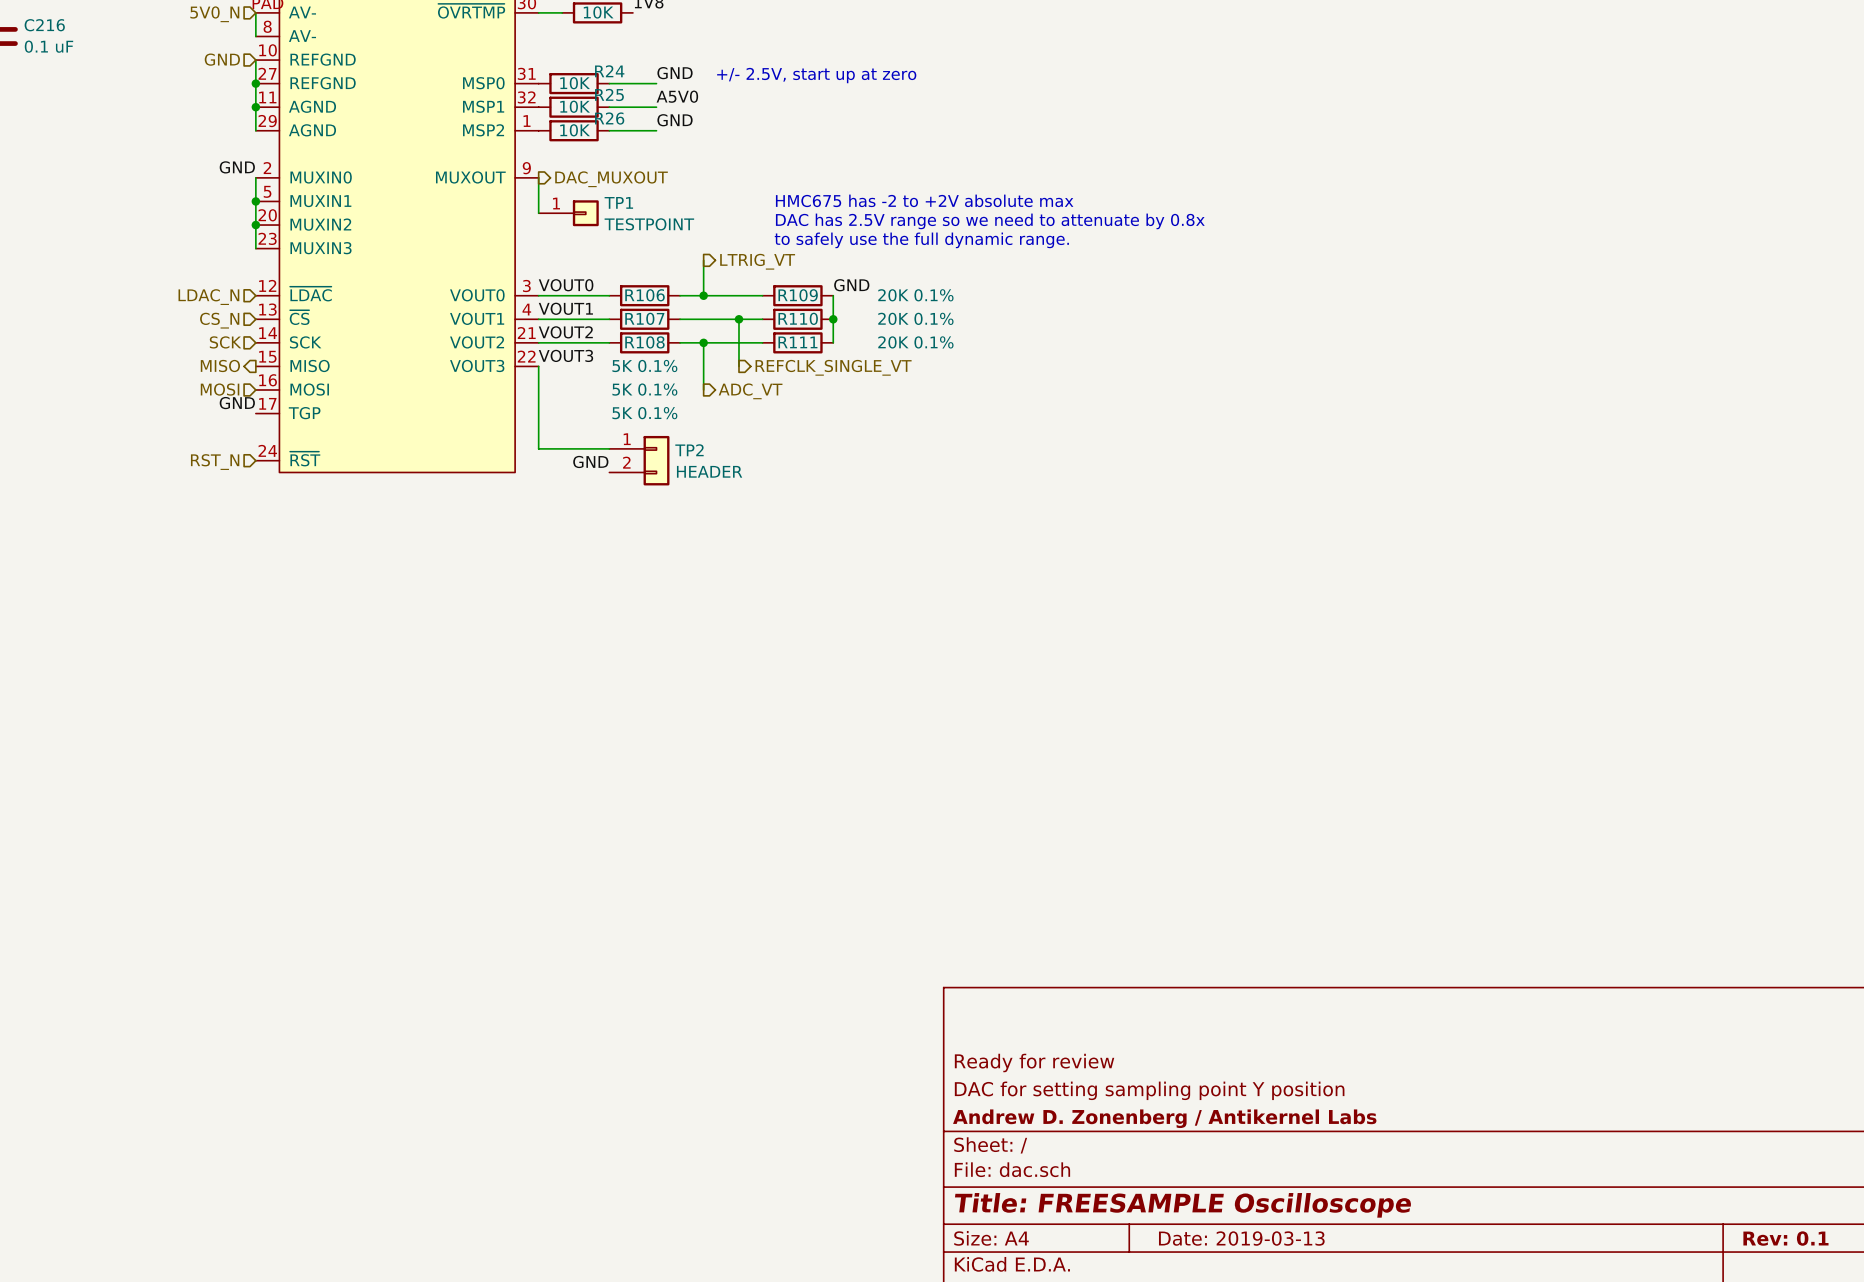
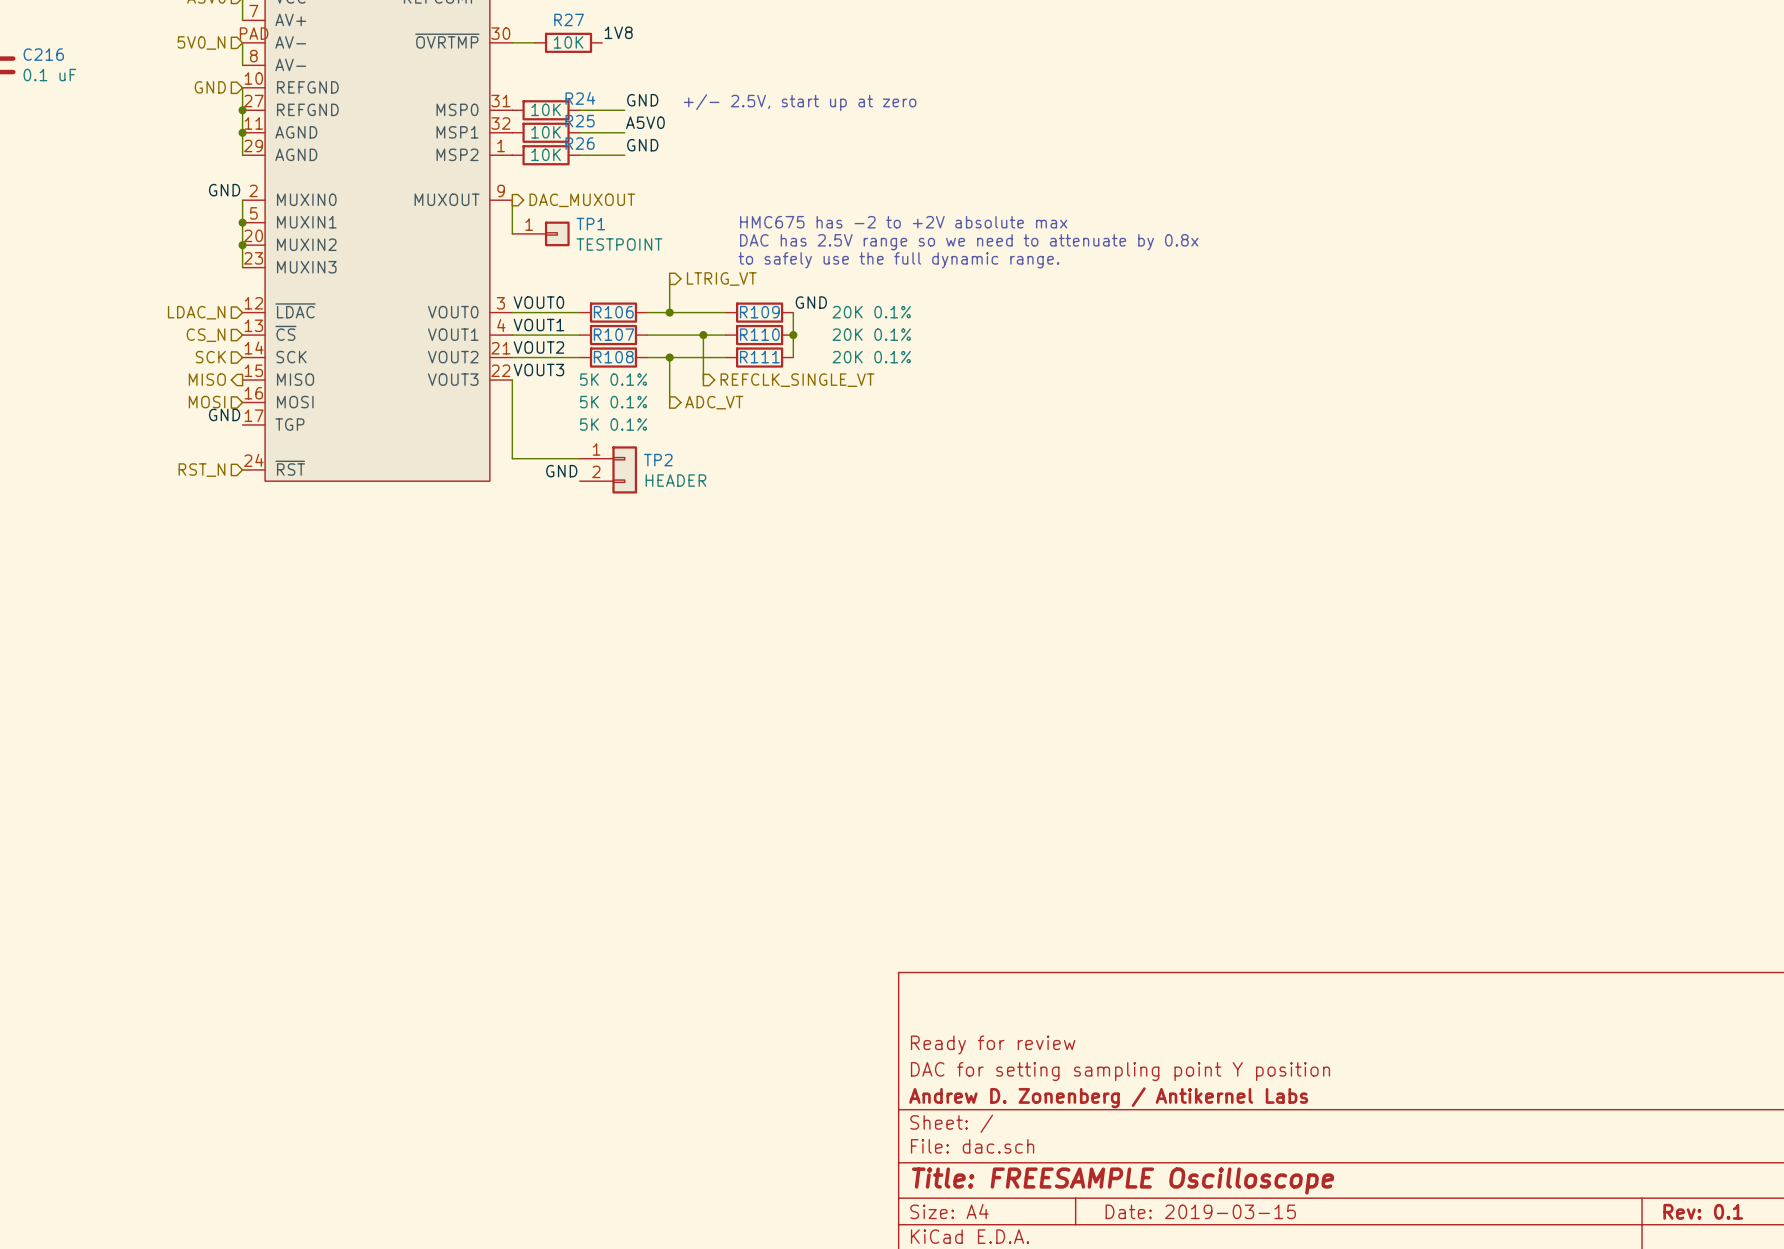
title block: Date: 2019-03-13 (1241, 1238) -> Date: 2019-03-15 (1200, 1211)

